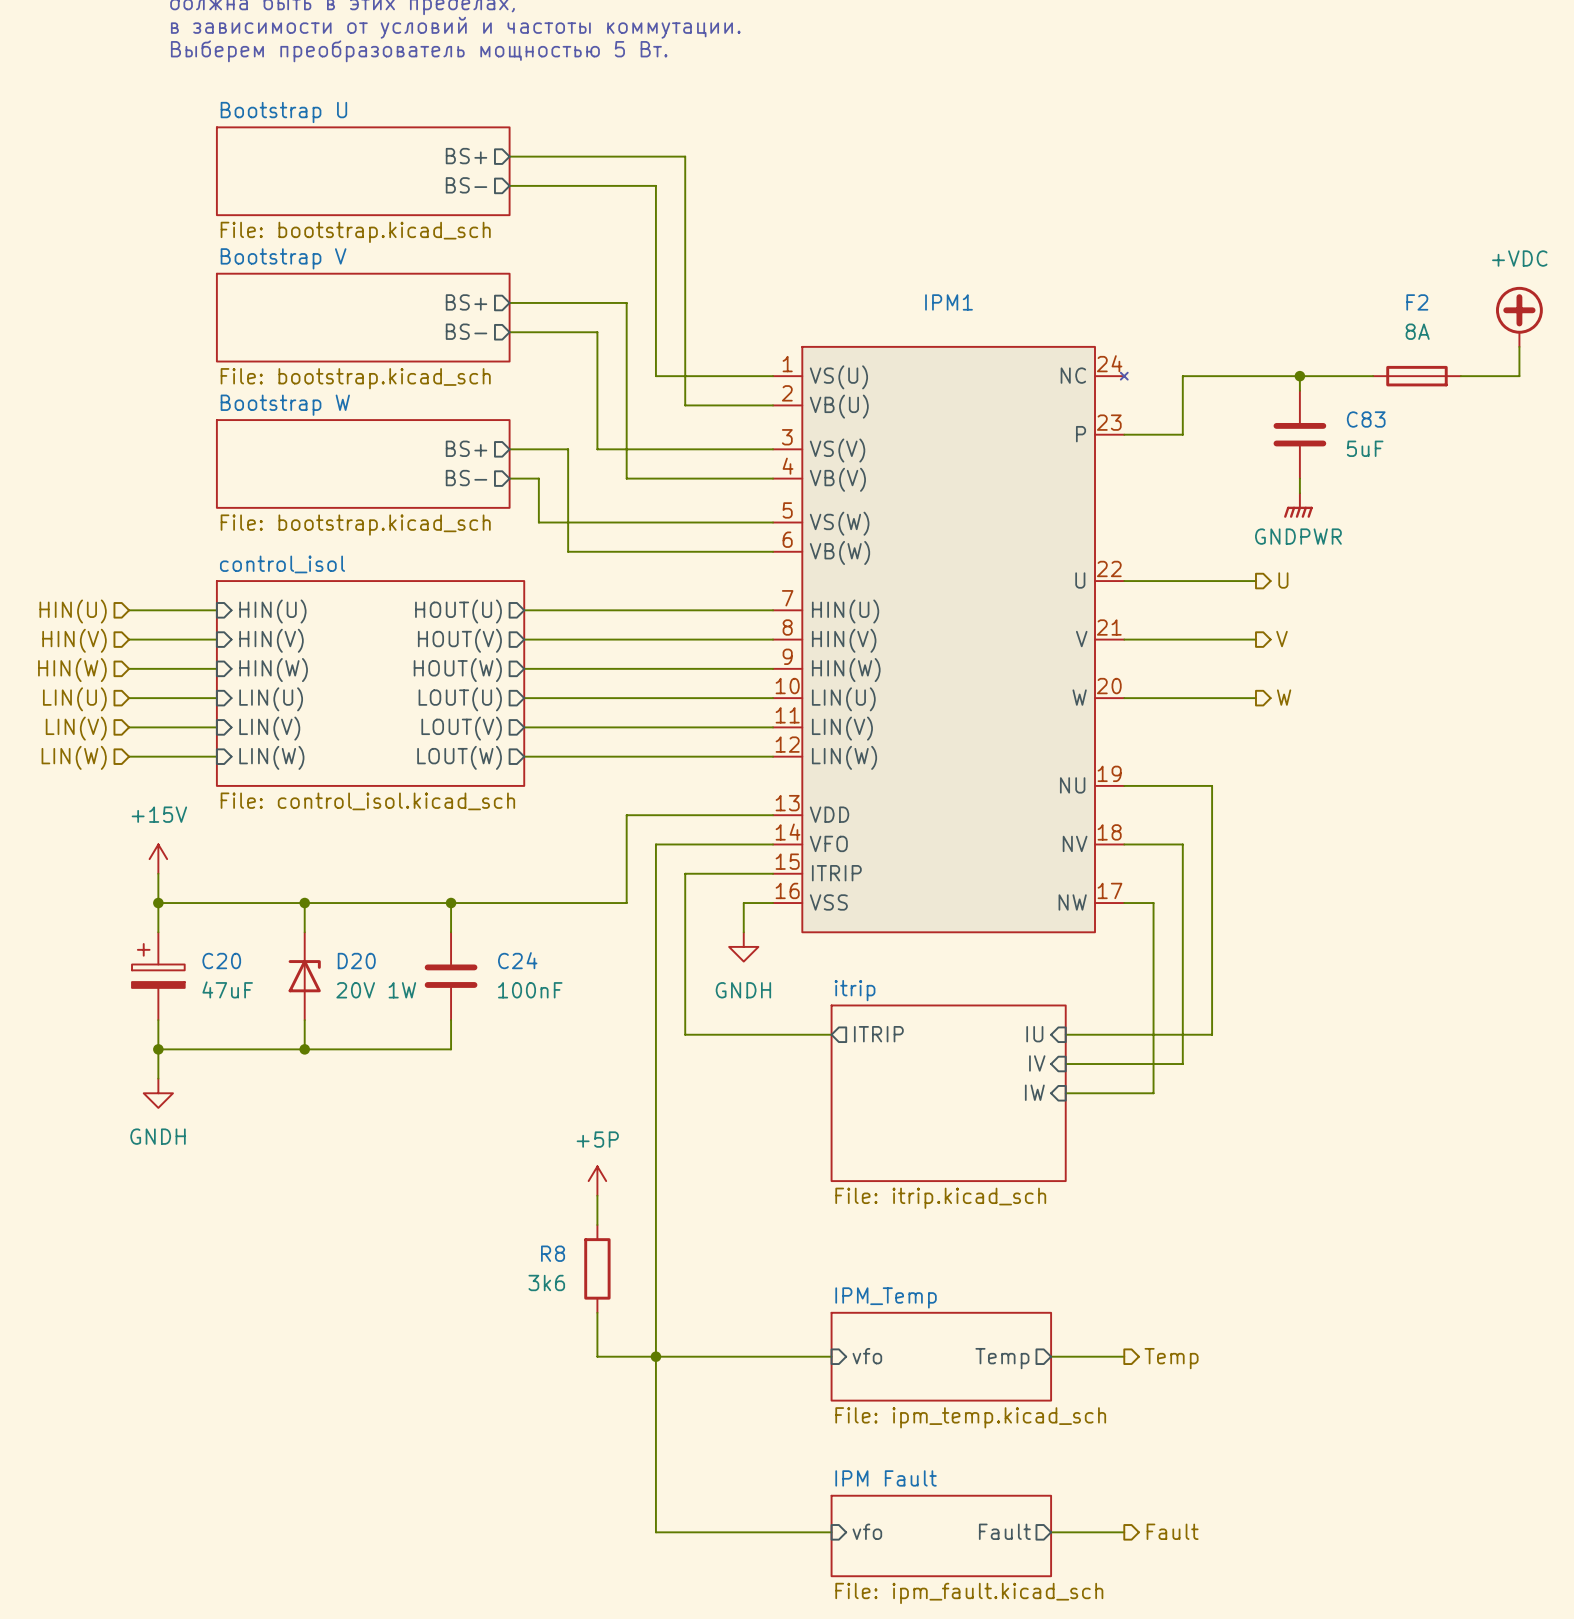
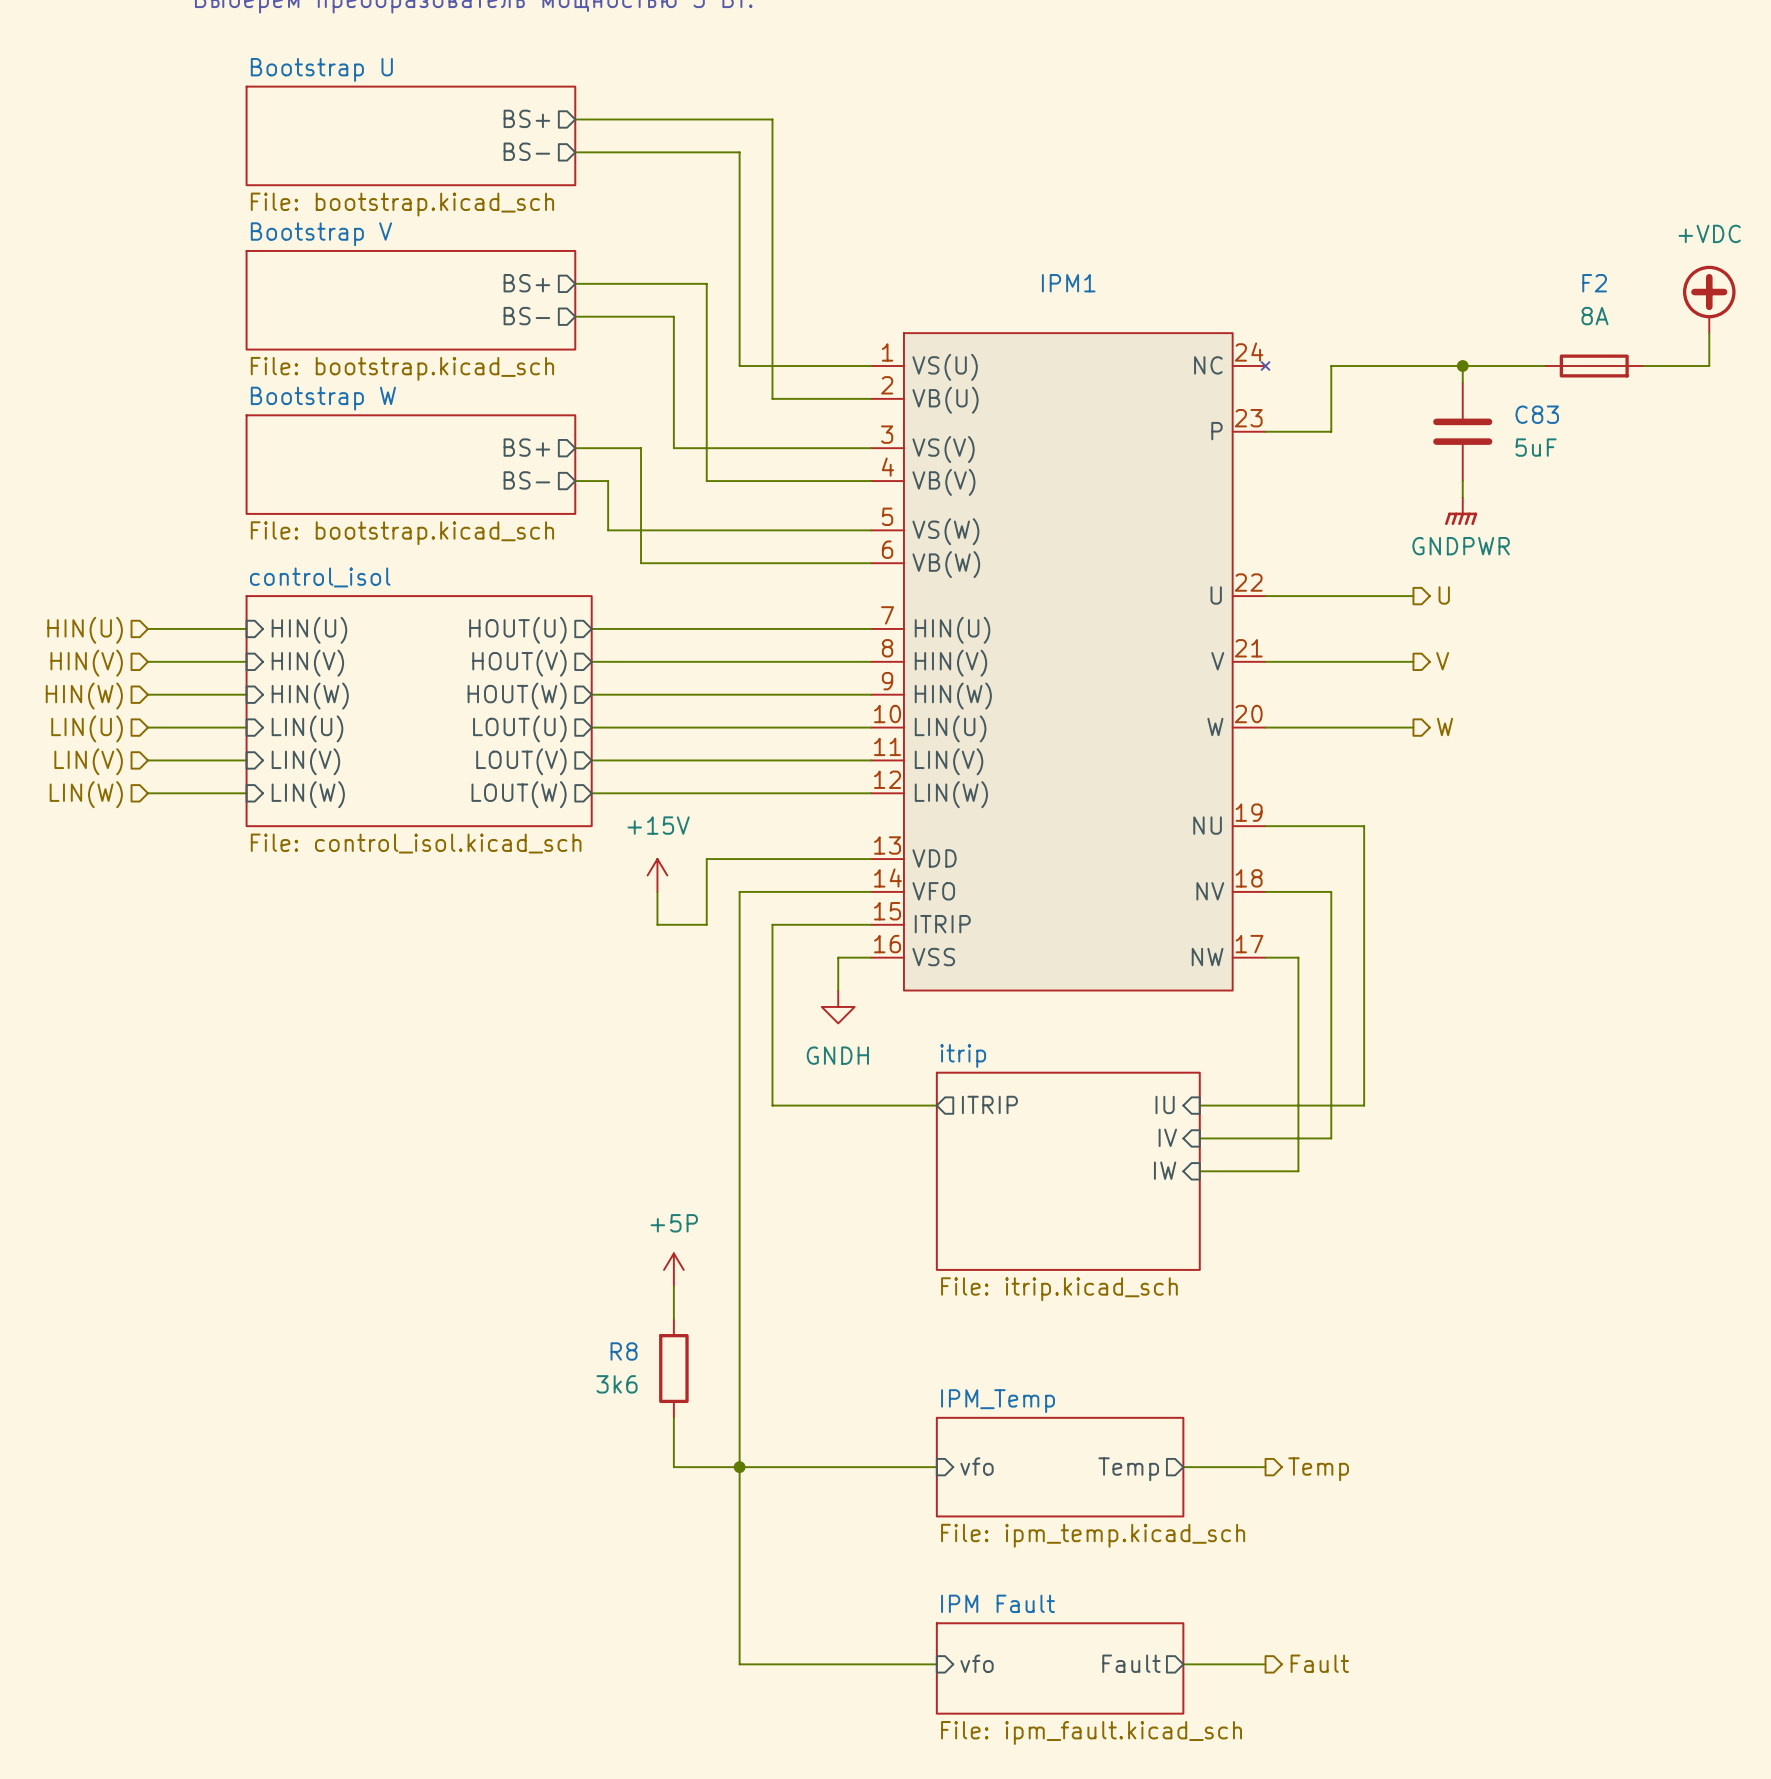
power symbol: none -> +15V (657, 875)
power symbol: +15V (158, 859) -> none
wire: (158, 873) (158, 932) -> none
wire: (626, 873) (626, 903) (158, 903) -> (706, 924) (657, 924) (657, 891)
junction: (158, 903) -> none
wire: (304, 903) (304, 932) -> none
junction: (304, 903) -> none
wire: (451, 903) (451, 932) -> none
junction: (451, 903) -> none
C20: 47uF (158, 976) -> none
D20: 20V 1W (304, 976) -> none
C24: 100nF (451, 976) -> none
wire: (158, 1020) (158, 1078) -> none
wire: (304, 1020) (304, 1049) -> none
wire: (451, 1020) (451, 1049) (158, 1049) -> none
junction: (158, 1049) -> none
junction: (304, 1049) -> none
power symbol: GNDH (158, 1093) -> none

